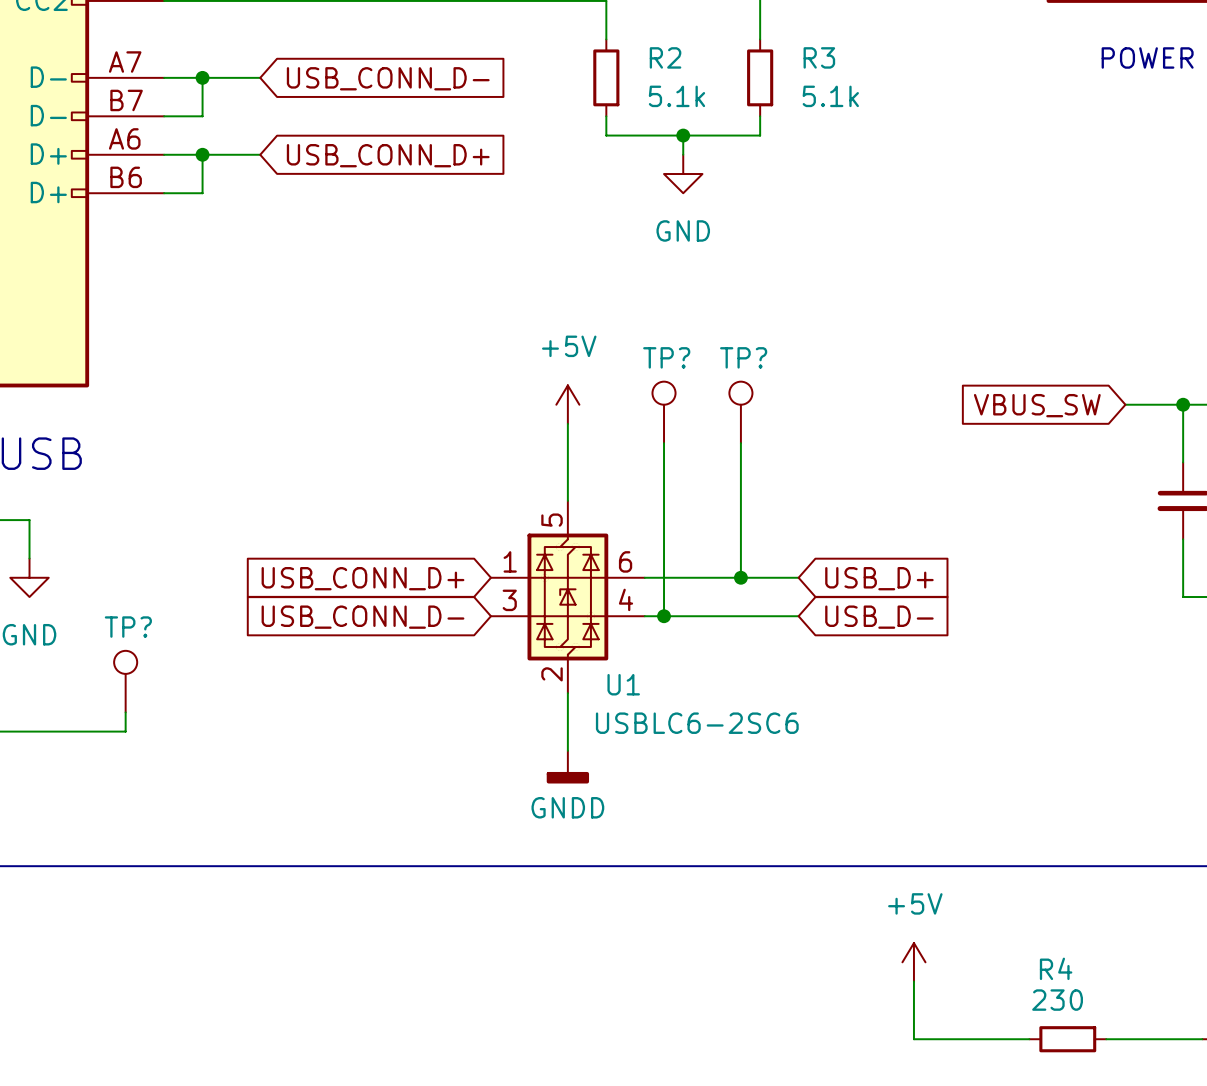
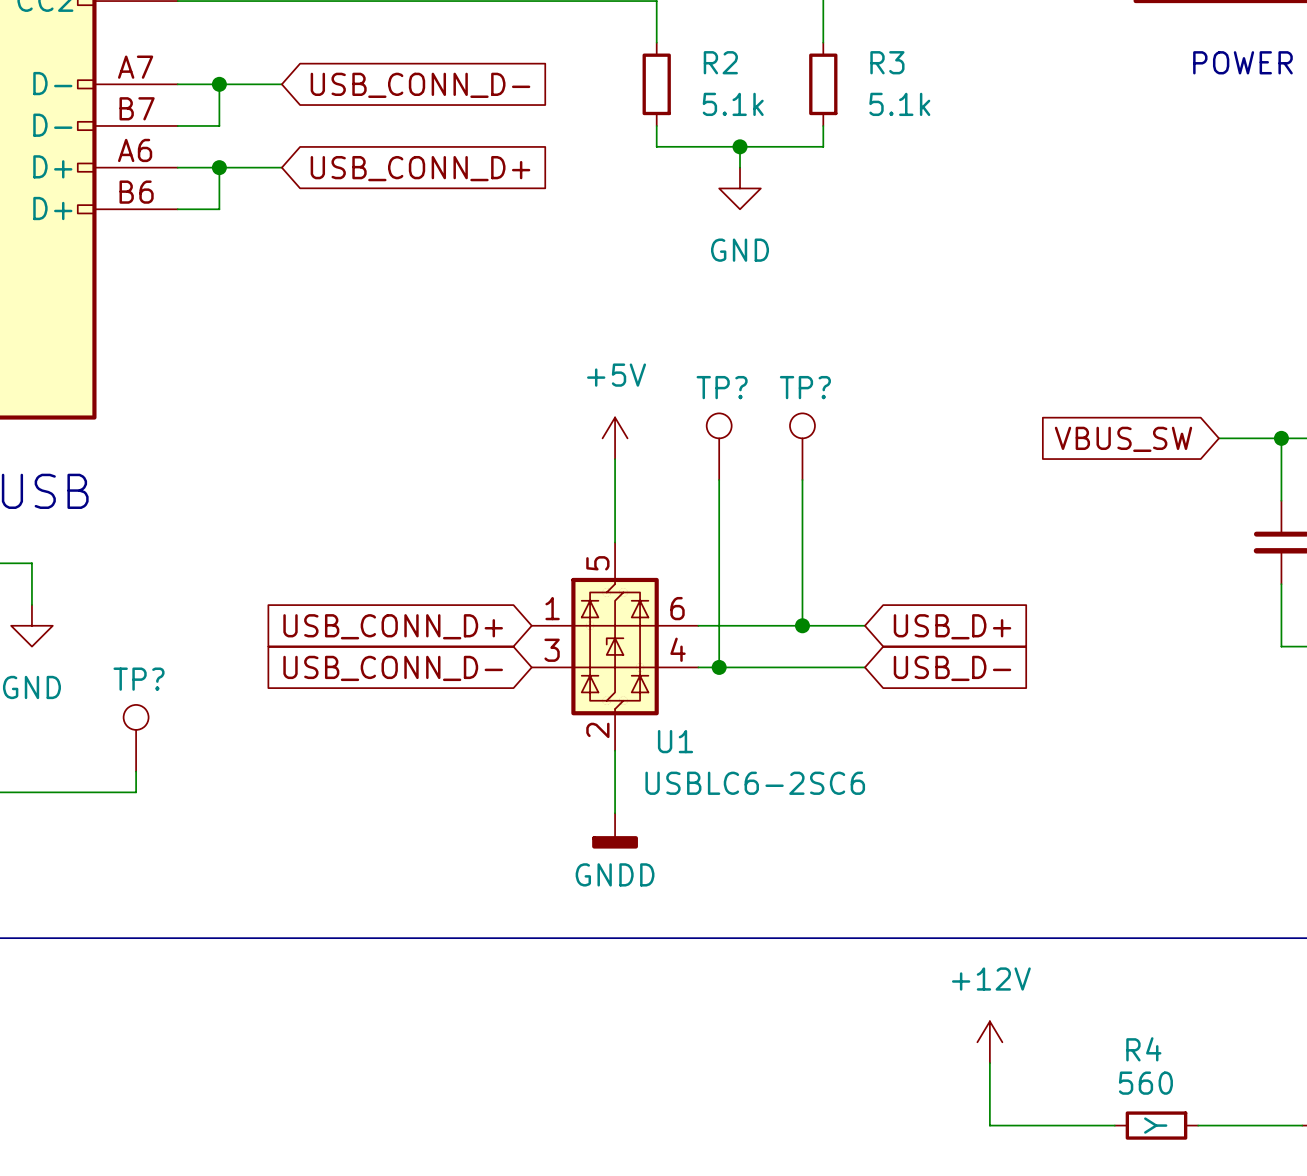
power symbol: +5V (913, 962) -> +12V (989, 1042)
R4 value: 230 (1057, 1000) -> 560 (1145, 1083)
R4 text: none -> Y (1155, 1125)

